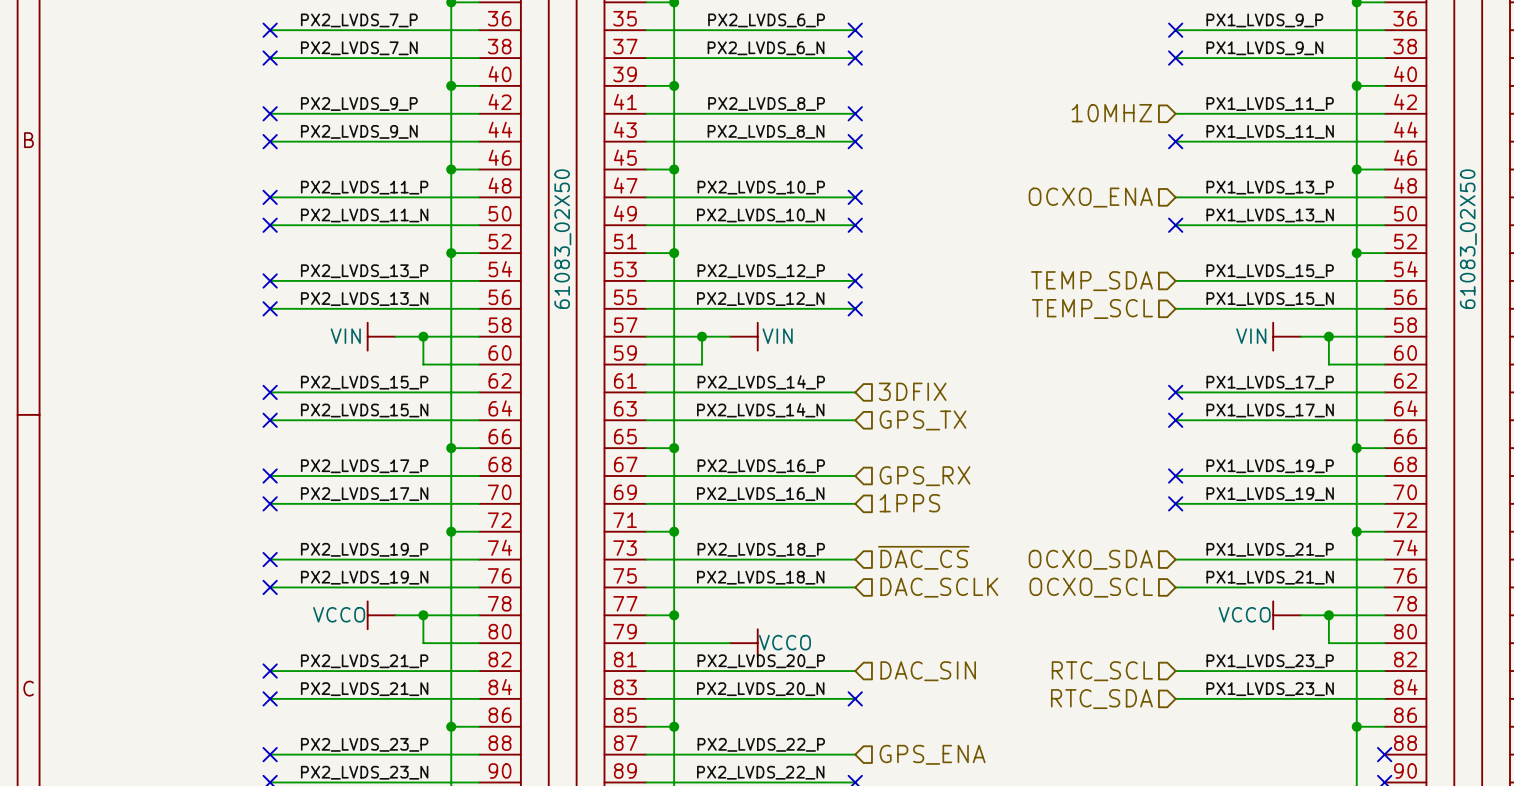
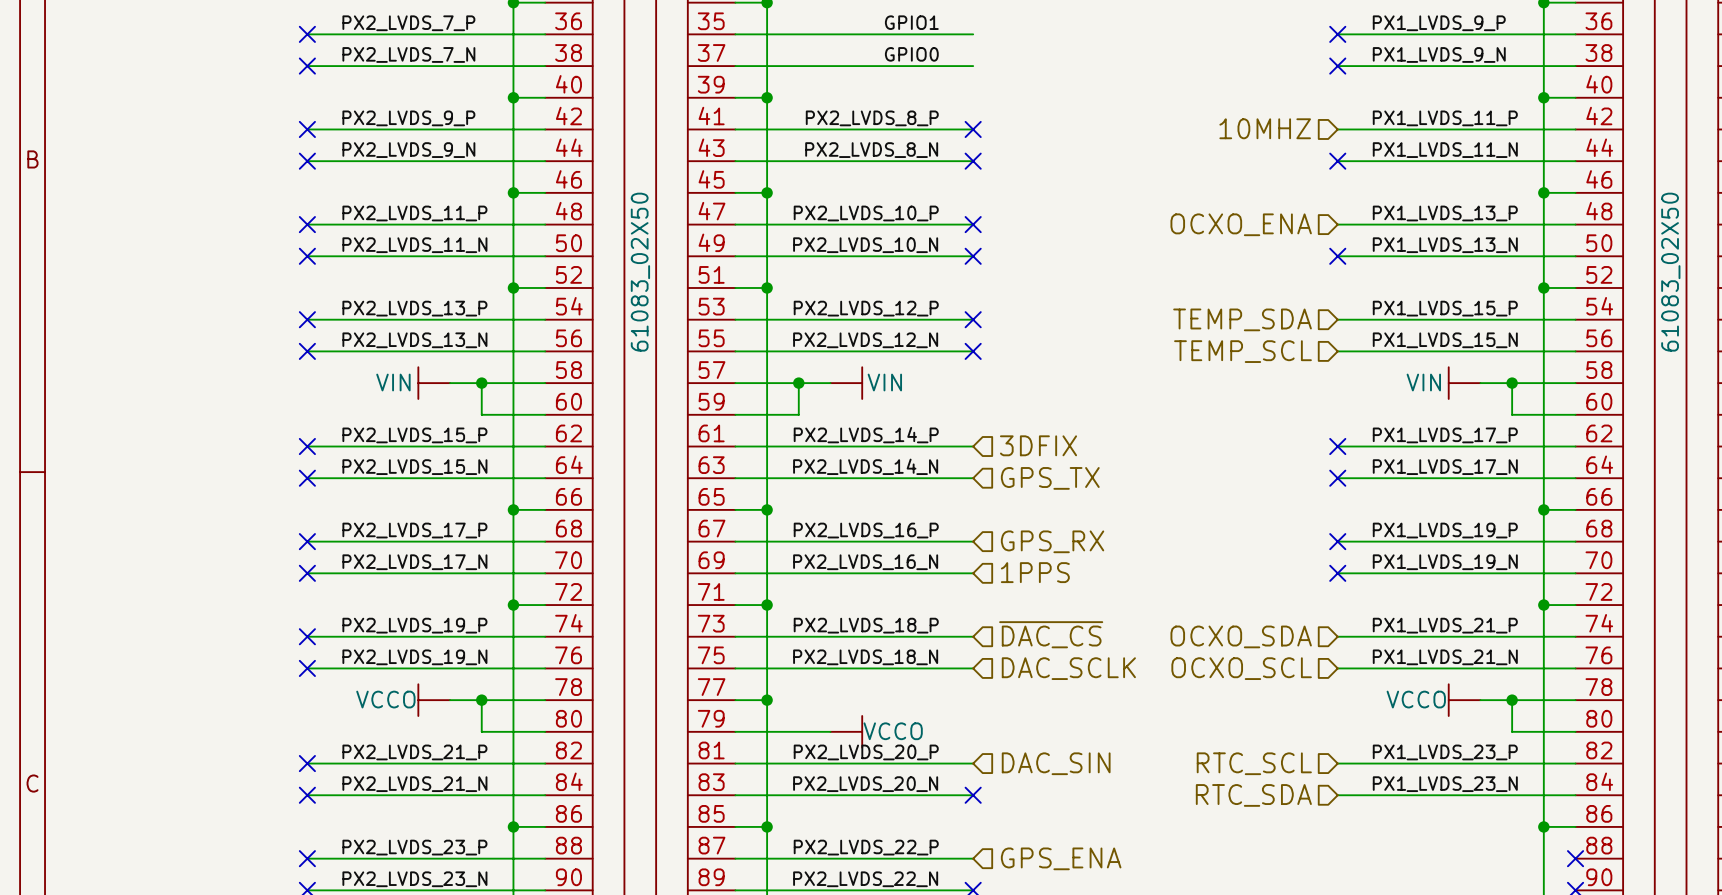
label: PX2_LVDS_6_P (766, 20) -> GPIO1 (911, 22)
no-connect mark: (855, 30) -> none
label: PX2_LVDS_6_N (766, 48) -> GPIO0 (911, 54)
no-connect mark: (855, 58) -> none

